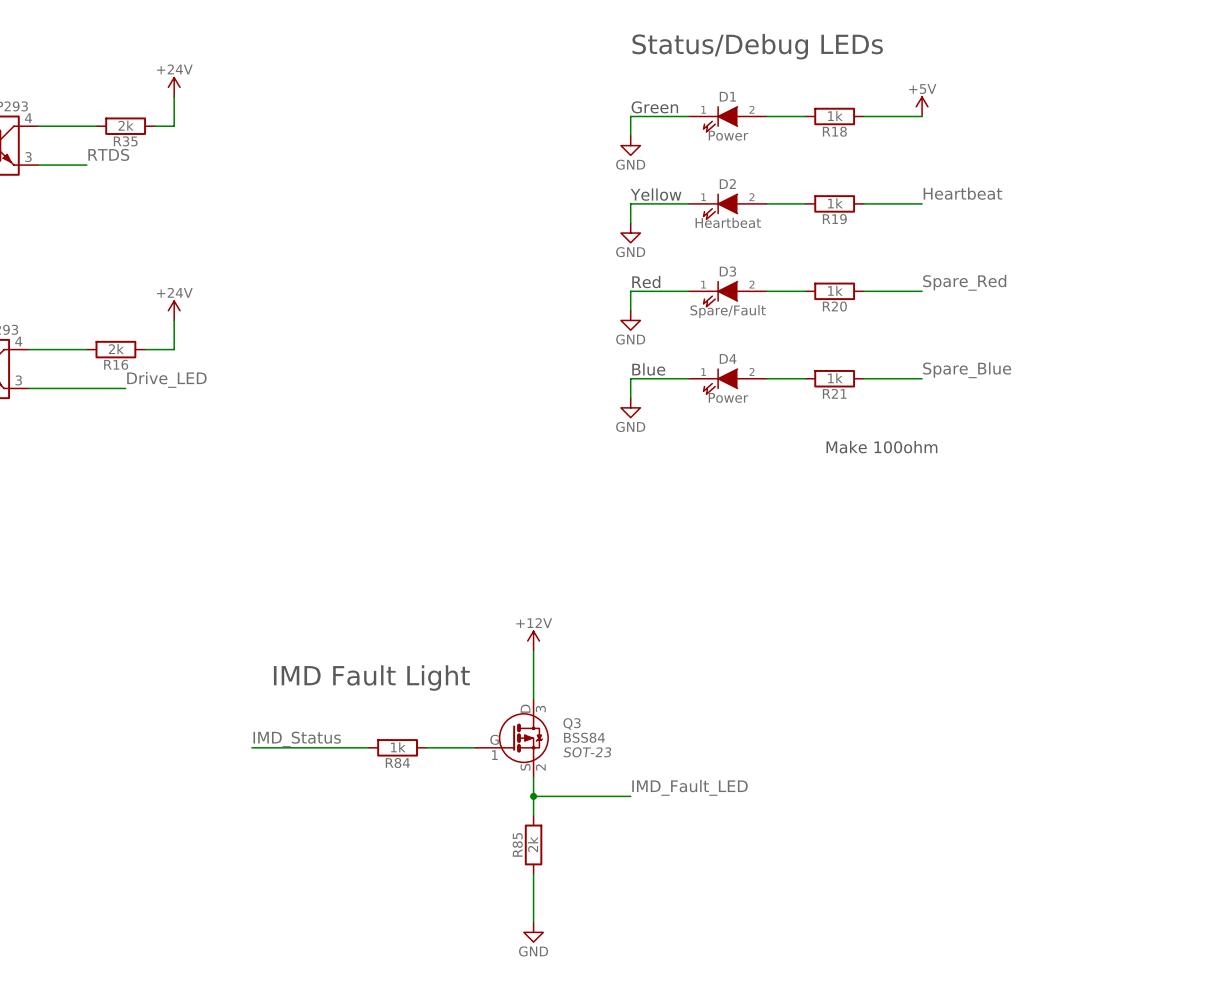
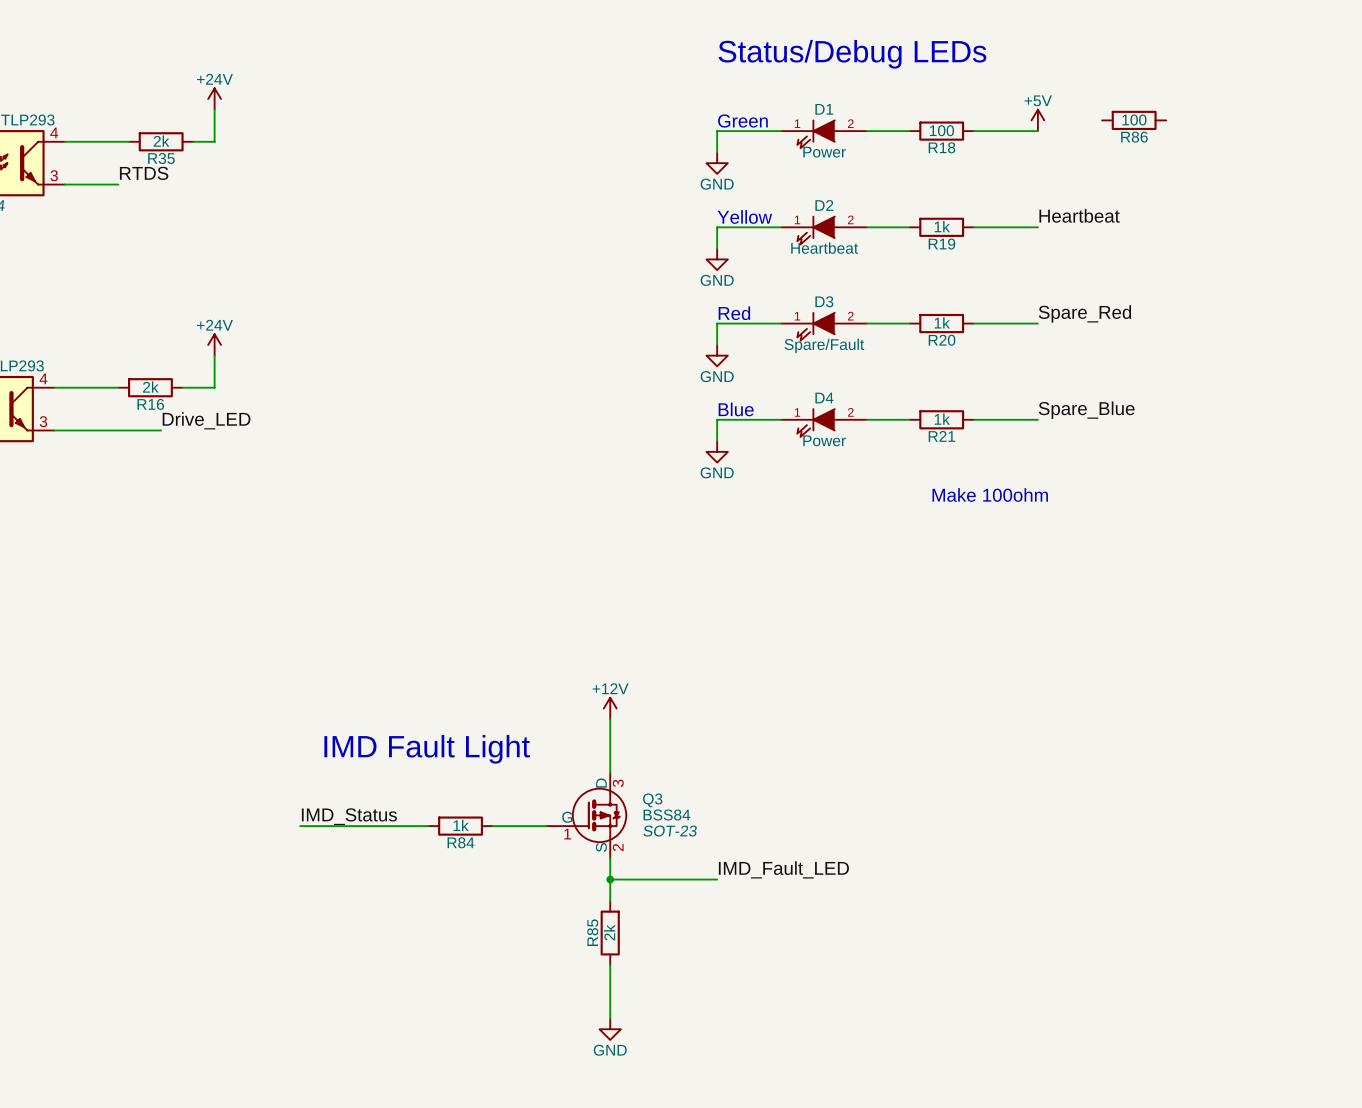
R86: none -> 100 (1134, 120)
R18 value: 1k (835, 115) -> 100 (941, 130)

